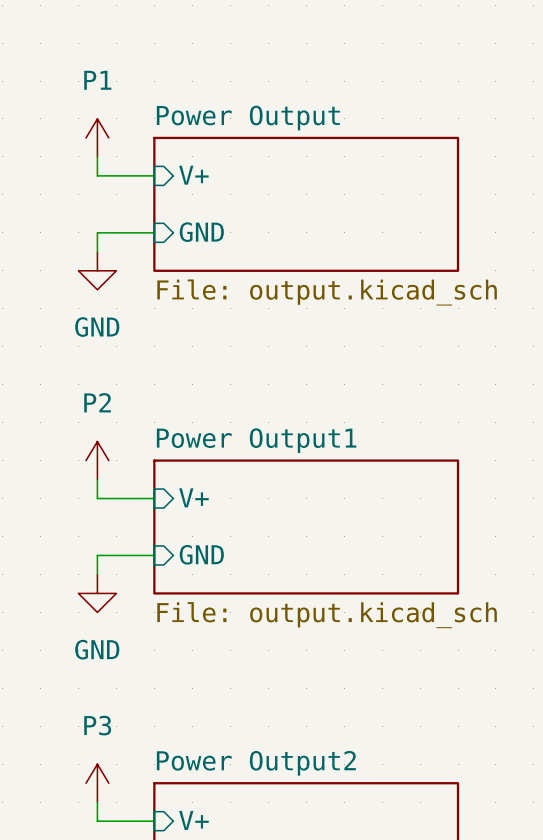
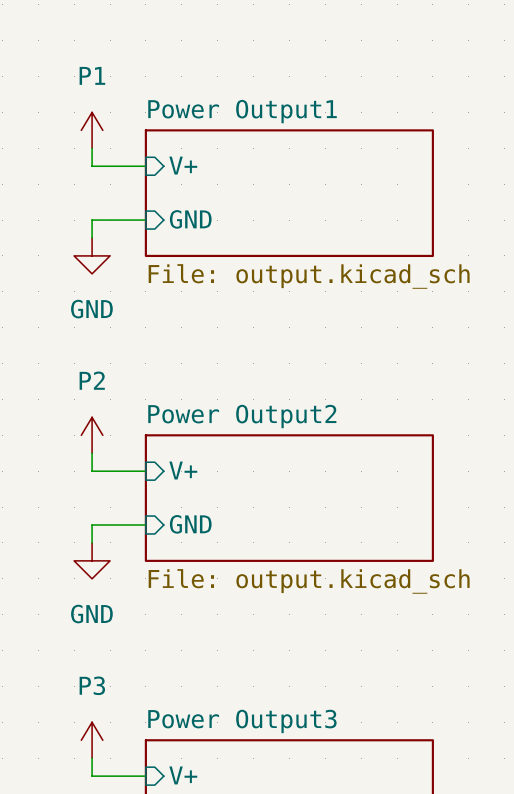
sheet Power Output name: Power Output (248, 118) -> Power Output1 (242, 111)
sheet Power Output1 name: Power Output1 (256, 440) -> Power Output2 (242, 416)
sheet Power Output2 name: Power Output2 (256, 763) -> Power Output3 (242, 721)

